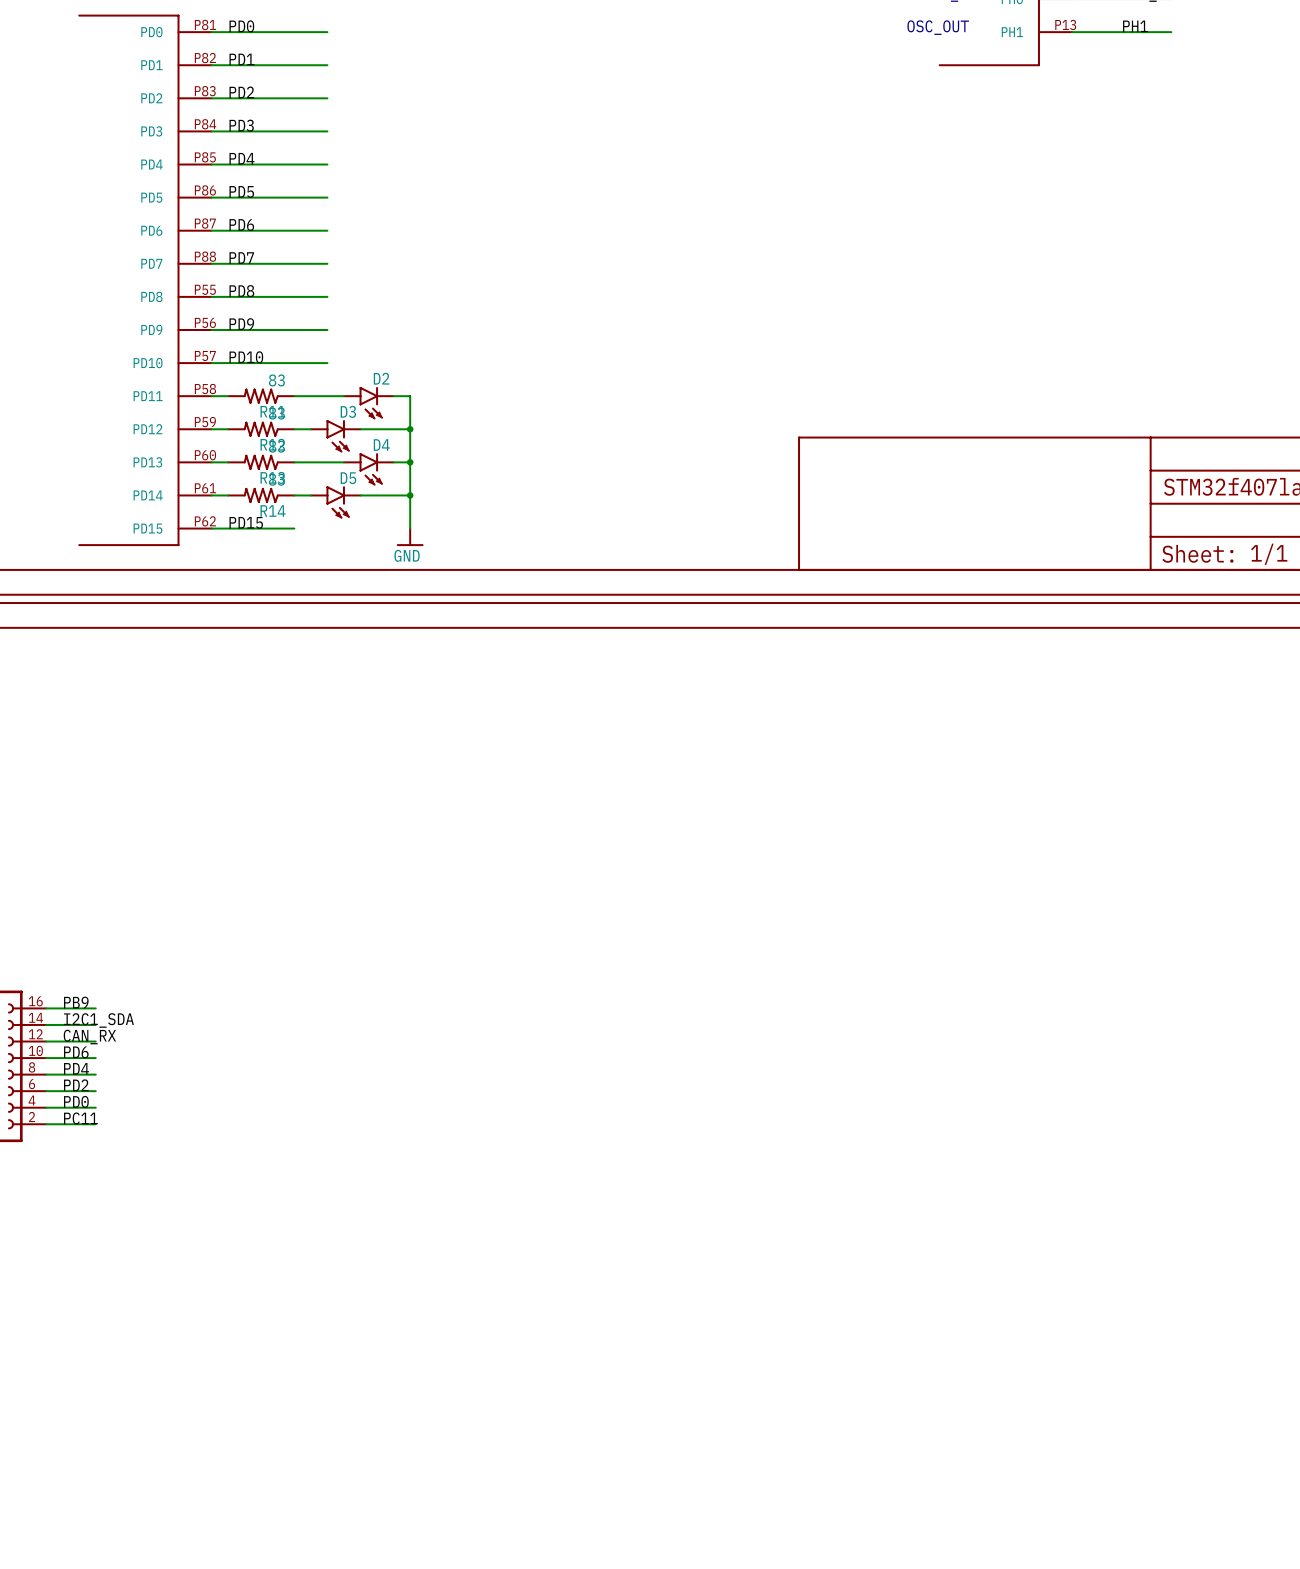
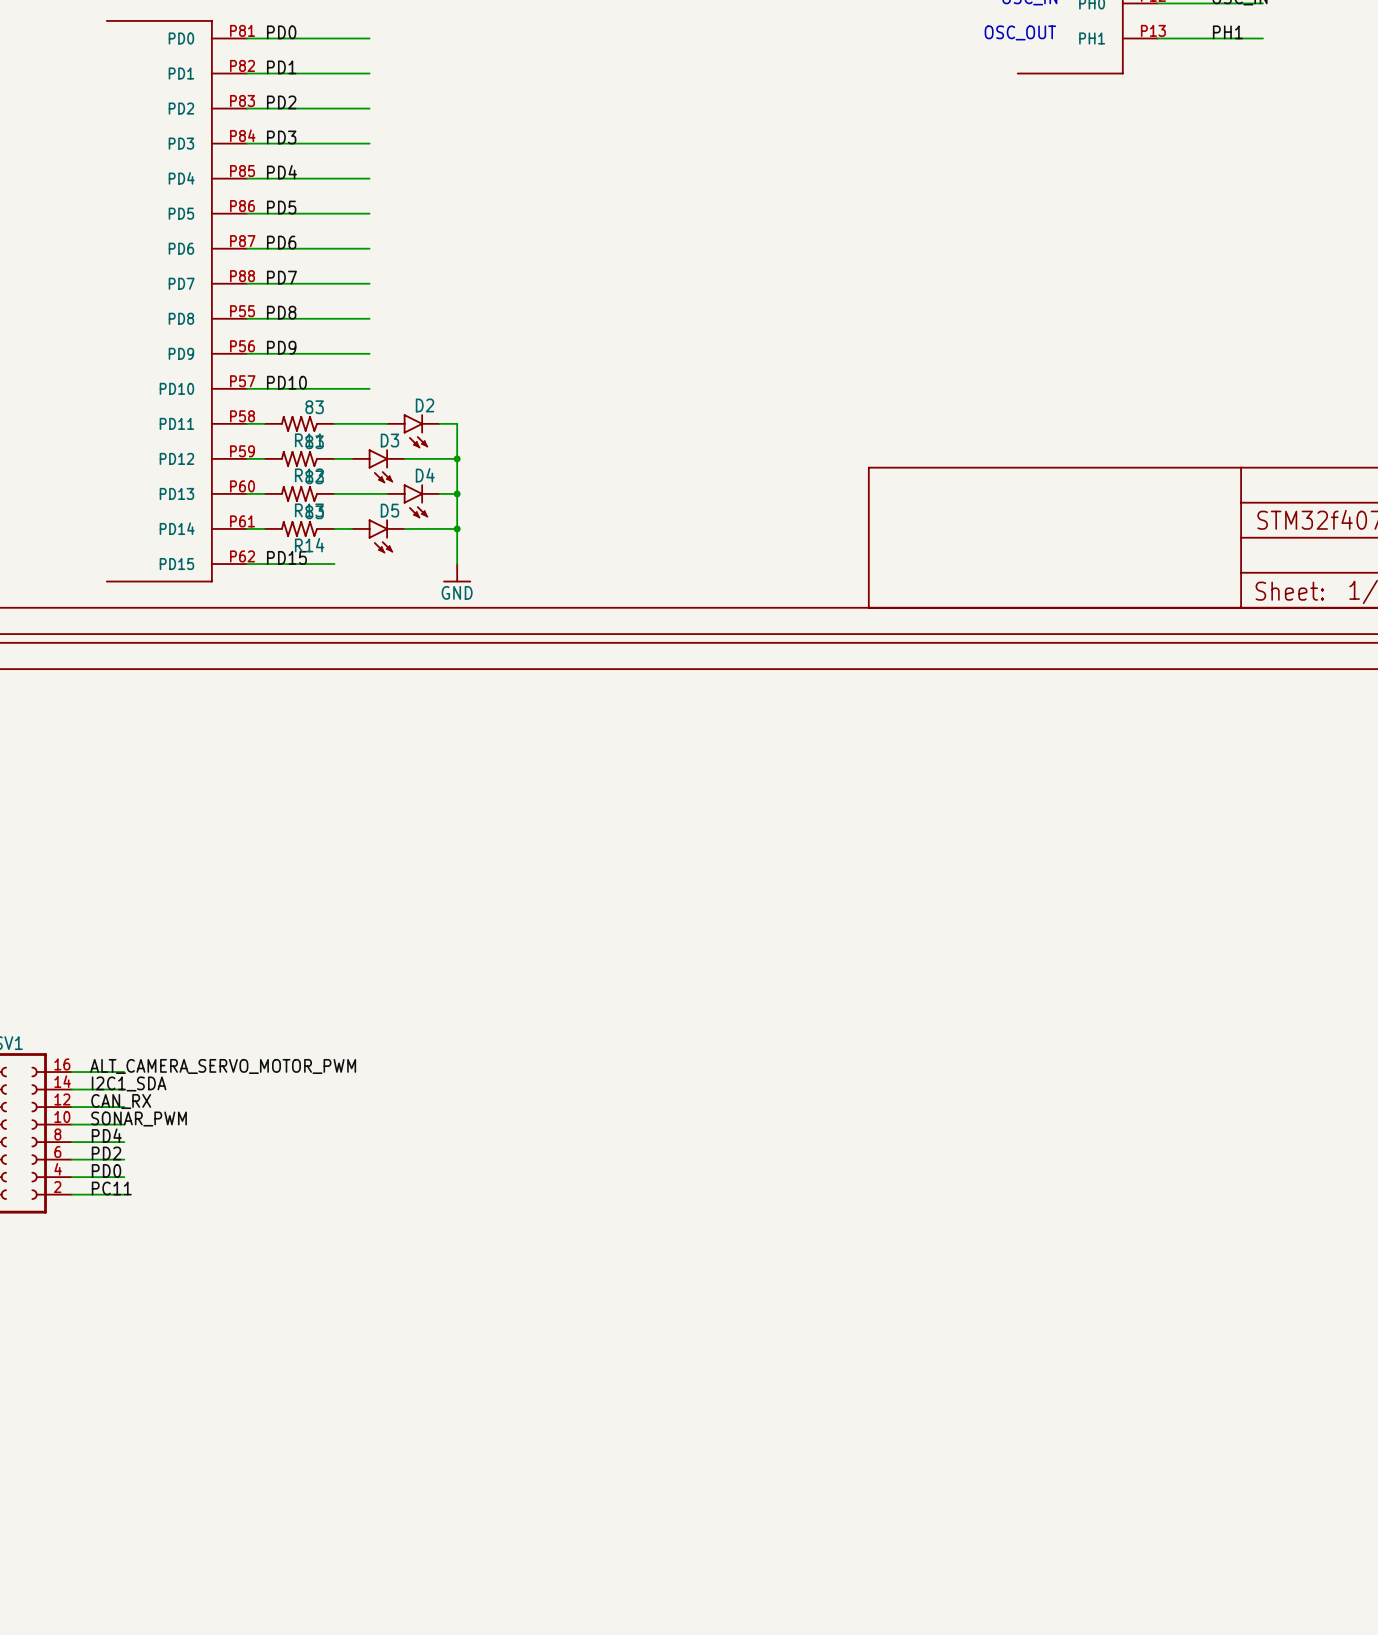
label: PB9 (76, 1002) -> ALT_CAMERA_SERVO_MOTOR_PWM (223, 1066)
label: PD6 (76, 1052) -> SONAR_PWM (139, 1119)

